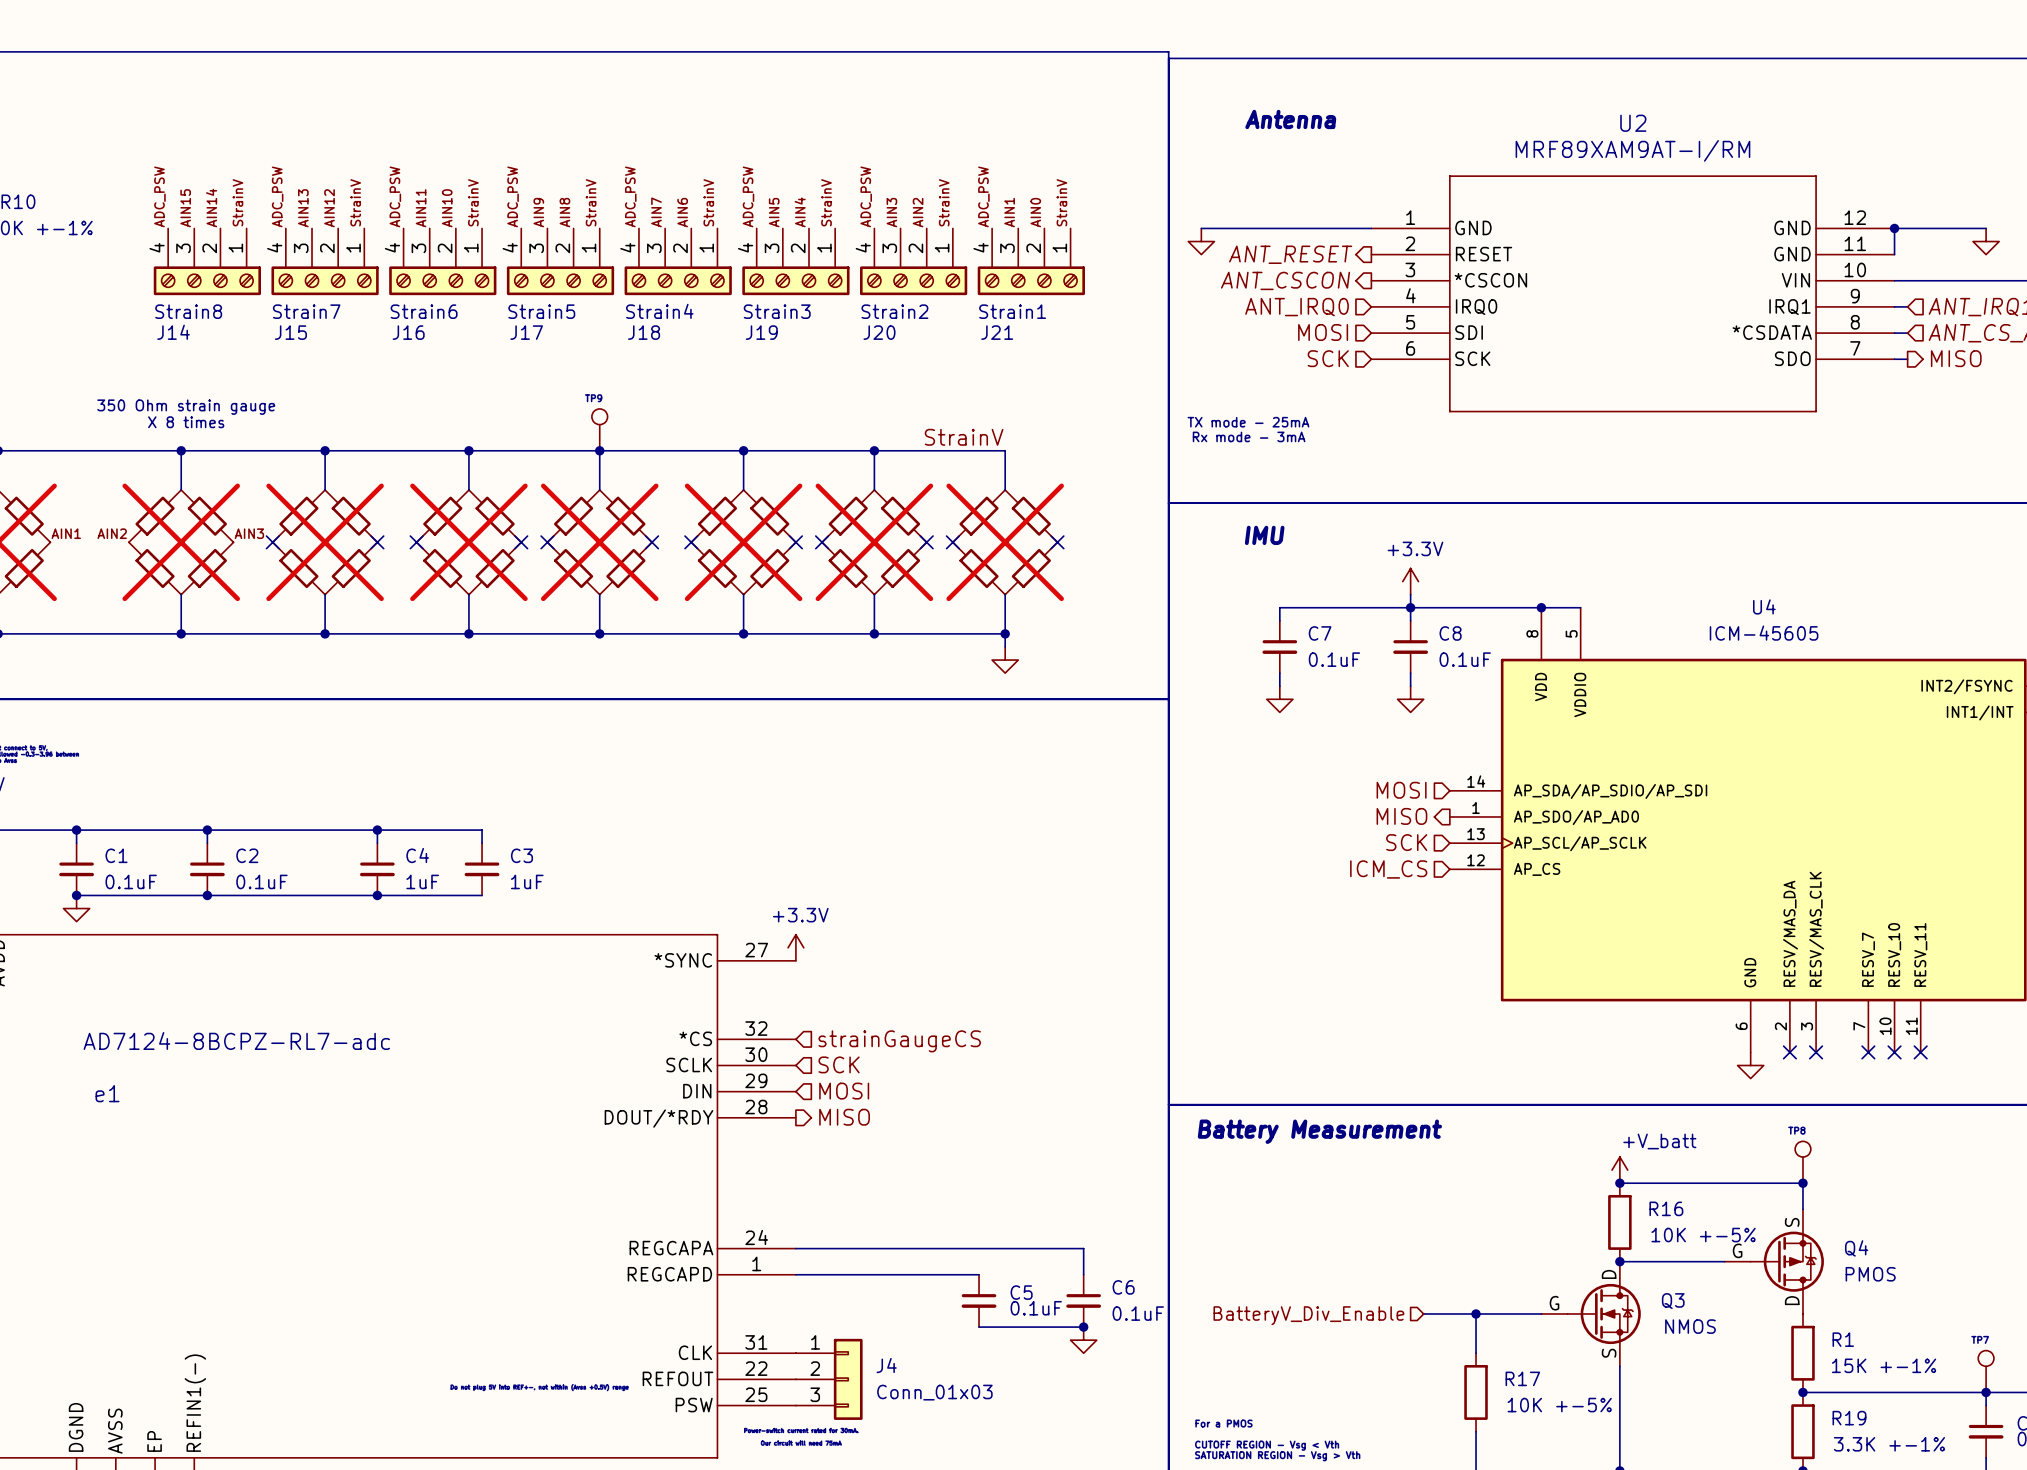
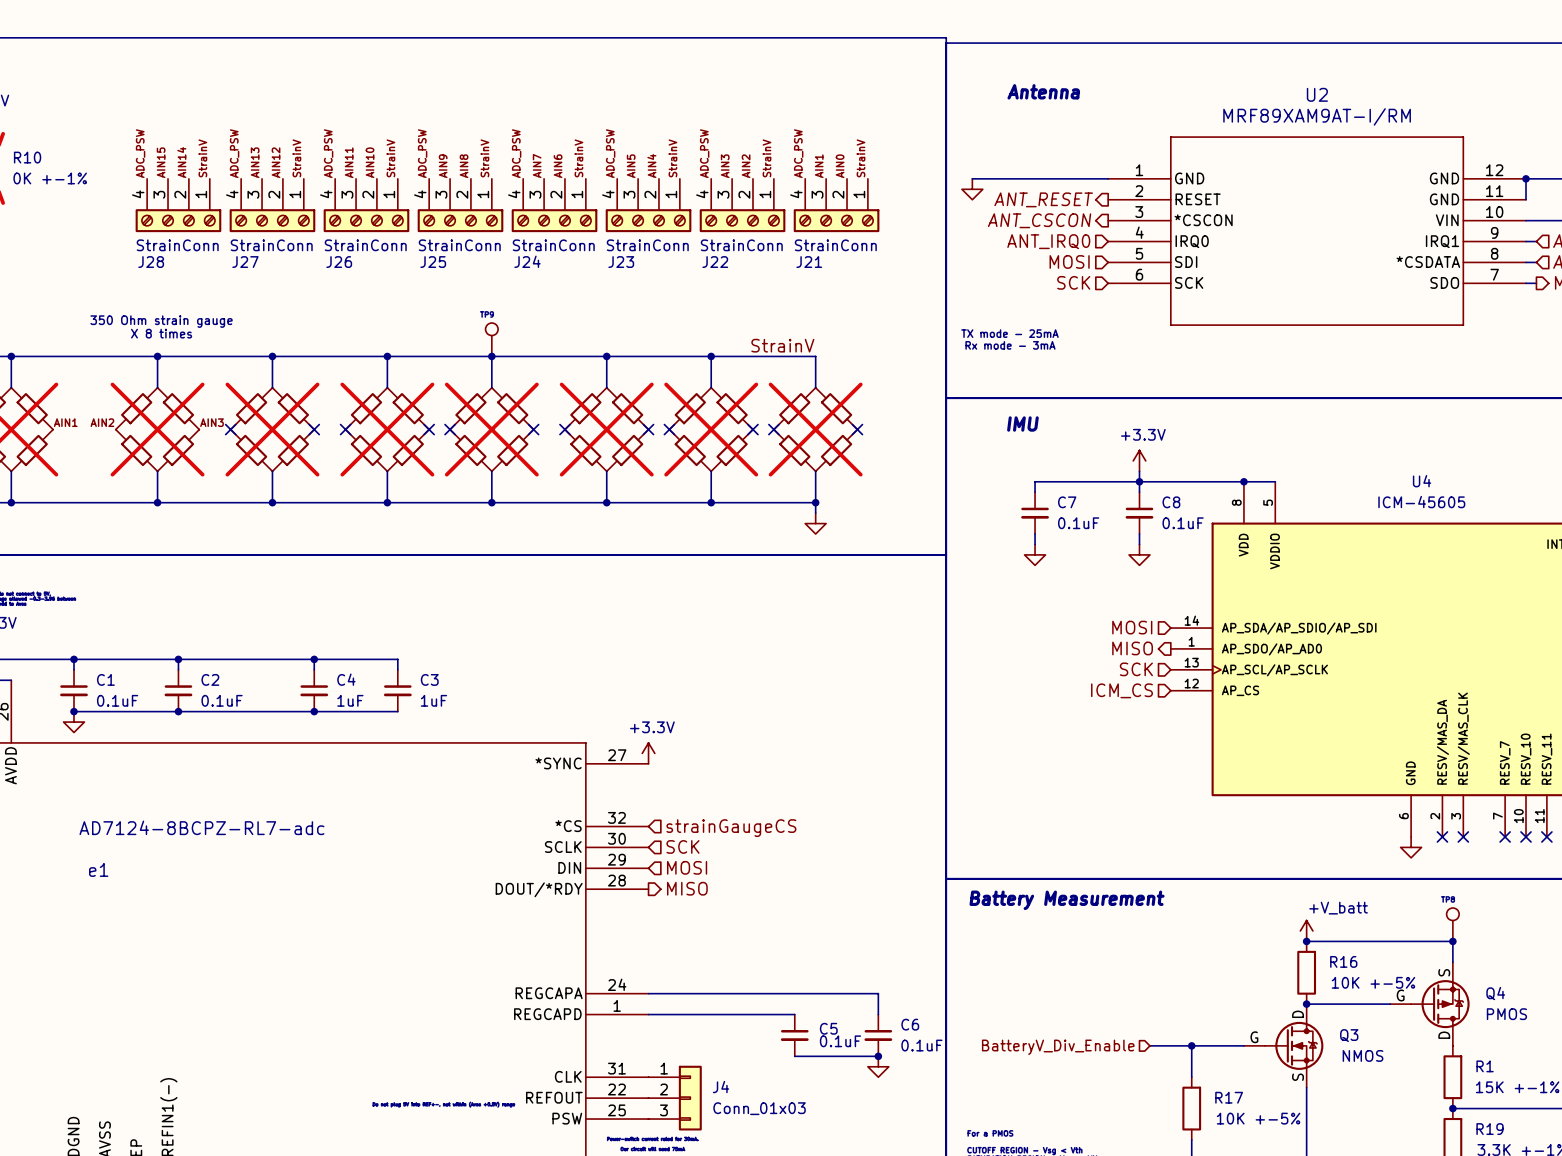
J14 value: Strain8 (188, 311) -> StrainConn (177, 245)
J15 value: Strain7 (306, 311) -> StrainConn (271, 245)
J16 value: Strain6 (424, 311) -> StrainConn (365, 245)
J17 value: Strain5 (541, 311) -> StrainConn (459, 245)
J18 value: Strain4 (659, 311) -> StrainConn (553, 245)
J19 value: Strain3 (777, 311) -> StrainConn (647, 245)
J20 value: Strain2 (894, 311) -> StrainConn (741, 245)
J21 value: Strain1 (1012, 311) -> StrainConn (835, 245)
J14 name: J14 (173, 332) -> J28 (151, 262)
J15 name: J15 (290, 332) -> J27 (245, 262)
J16 name: J16 (408, 332) -> J26 (339, 262)
J17 name: J17 (526, 332) -> J25 (433, 262)
J18 name: J18 (644, 332) -> J24 (527, 261)
J19 name: J19 (761, 332) -> J23 (621, 262)
J20 name: J20 (879, 332) -> J22 (715, 262)

